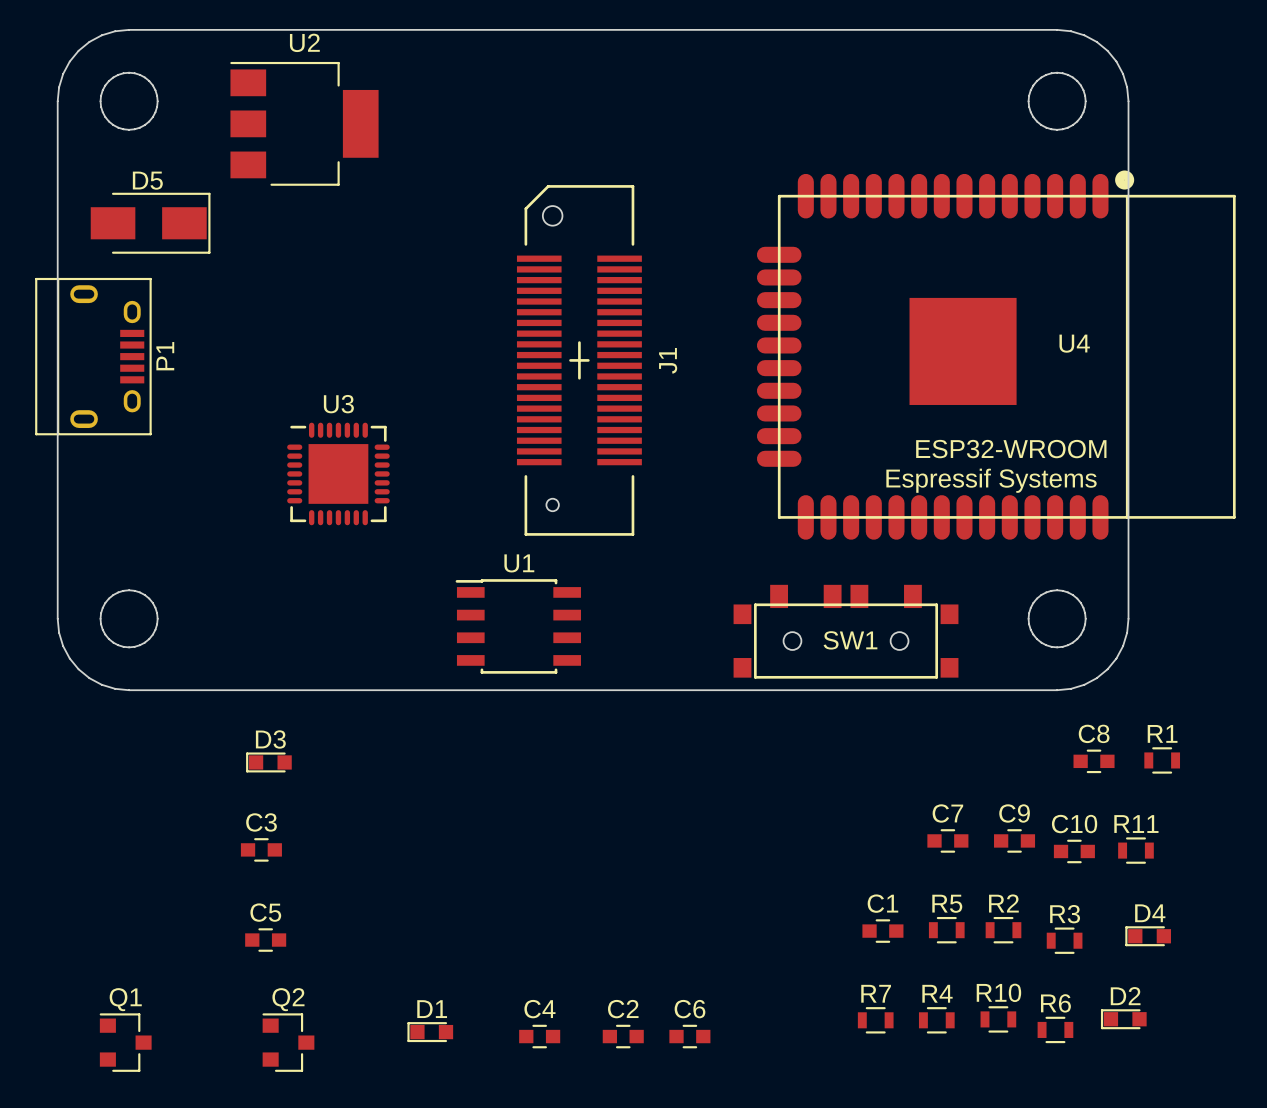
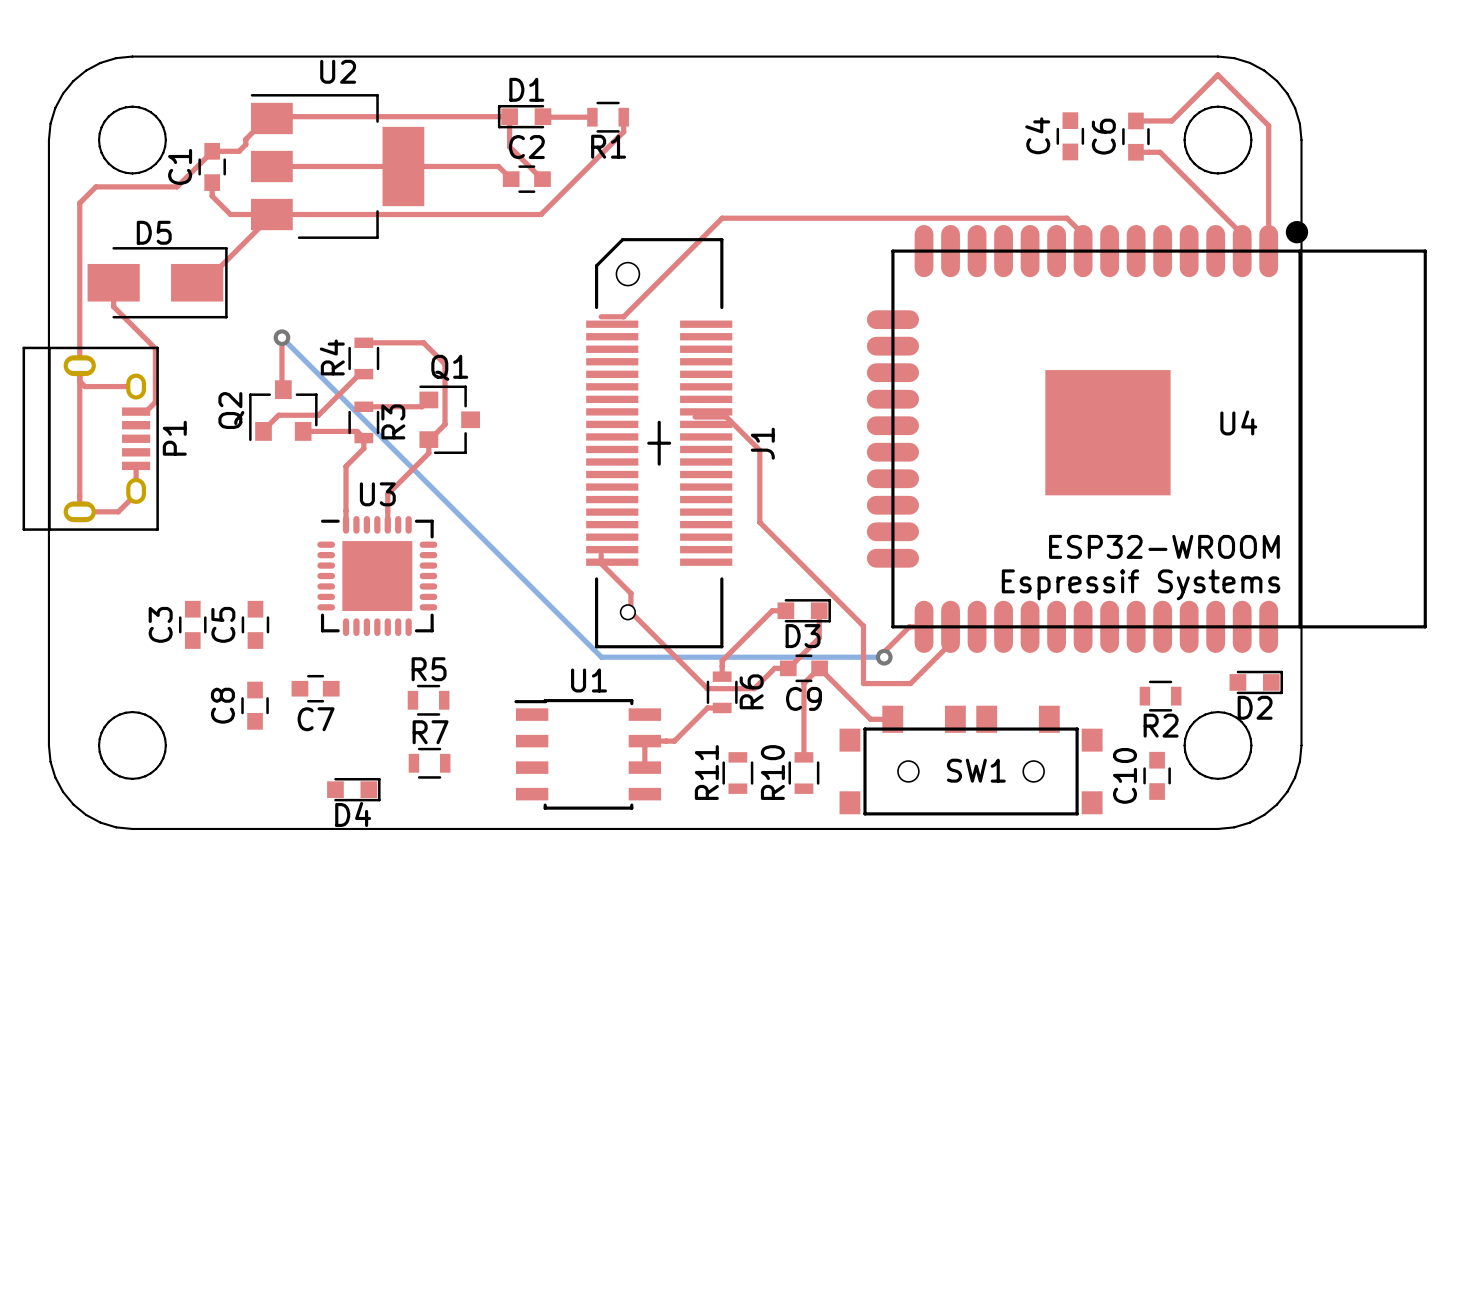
top track: none -> (543, 116) (592, 117)
top track: none -> (623, 117) (623, 131) (541, 214) (230, 214) (212, 196) (212, 182)
top track: none -> (1135, 120) (1171, 120) (1217, 74) (1268, 125) (1268, 251)
top track: none -> (1135, 152) (1160, 152) (1242, 234) (1242, 251)
top track: none -> (271, 166) (498, 166) (511, 179)
top track: none -> (542, 179) (509, 146) (509, 116) (273, 116) (266, 118) (245, 139) (245, 144) (239, 151) (212, 151) (177, 186) (95, 186) (79, 203) (79, 511) (118, 511) (136, 494) (136, 465)
top track: none -> (271, 214) (204, 282) (197, 282)
top track: none -> (1083, 251) (1083, 234) (1066, 218) (722, 218) (623, 316) (601, 316)
top track: none -> (113, 282) (113, 306) (155, 348) (155, 402) (146, 411) (136, 411)
top track: none -> (281, 337) (283, 389)
bottom track: none -> (281, 337) (601, 657) (884, 657)
via: none -> (281, 337)
top track: none -> (363, 342) (423, 342) (445, 364) (445, 424) (428, 439) (428, 453) (387, 494) (387, 524)
top track: none -> (363, 374) (359, 374) (318, 415) (278, 415) (263, 431)
top track: none -> (79, 381) (84, 386) (136, 386)
top track: none -> (428, 399) (422, 406) (363, 406)
top track: none -> (695, 417) (726, 417) (759, 450) (759, 522) (863, 626) (863, 683) (910, 683) (950, 643)
top track: none -> (303, 431) (357, 431) (363, 438) (363, 448) (346, 466) (346, 524)
top track: none -> (601, 554) (601, 563) (630, 593) (630, 612) (707, 688) (754, 688) (774, 668) (788, 668) (819, 637) (819, 610)
top track: none -> (785, 610) (772, 610) (722, 660) (722, 676)
top track: none -> (924, 626) (909, 626) (884, 652) (884, 657)
via: none -> (884, 657)
top track: none -> (722, 707) (707, 707) (674, 741) (644, 741) (644, 767)
top track: none -> (892, 719) (870, 719) (819, 668) (803, 683) (803, 757)
C8 name position: C8 (1094, 733) -> C8 (222, 705)
R1 name position: R1 (1162, 733) -> R1 (608, 146)
R1 position: (1162, 760) -> (608, 117)
C8 rotation: 0° (1094, 761) -> 90° clockwise (255, 705)
C8 position: (1094, 761) -> (255, 705)
D3 rotation: 0° (268, 762) -> 180° (804, 610)
D3 position: (268, 762) -> (804, 610)
C7 name position: C7 (947, 813) -> C7 (316, 719)
C9 name position: C9 (1014, 813) -> C9 (803, 698)
C3 name position: C3 (261, 822) -> C3 (160, 624)
C10 name position: C10 (1074, 824) -> C10 (1124, 775)
R11 name position: R11 (1136, 824) -> R11 (706, 772)
C7 position: (947, 840) -> (315, 688)
C9 position: (1014, 840) -> (803, 668)
C3 rotation: 0° (261, 849) -> 90° clockwise (192, 624)
C3 position: (261, 849) -> (192, 624)
R11 rotation: 0° (1135, 850) -> 90° clockwise (737, 773)
R11 position: (1135, 850) -> (737, 773)
C10 rotation: 0° (1074, 851) -> 90° clockwise (1157, 775)
C10 position: (1074, 851) -> (1157, 775)
C1 name position: C1 (882, 903) -> C1 (180, 166)
R2 name position: R2 (1003, 903) -> R2 (1161, 725)
C5 name position: C5 (265, 912) -> C5 (223, 624)
R5 position: (946, 930) -> (428, 700)
R2 position: (1003, 930) -> (1160, 696)
C1 rotation: 0° (882, 931) -> 90° clockwise (212, 166)
C1 position: (882, 931) -> (212, 166)
D4 rotation: 0° (1148, 936) -> 180° (353, 789)
D4 position: (1148, 936) -> (353, 789)
C5 rotation: 0° (265, 940) -> 90° clockwise (255, 624)
C5 position: (265, 940) -> (255, 624)
R3 rotation: 0° (1064, 940) -> 90° clockwise (363, 422)
R3 position: (1064, 940) -> (363, 422)
R10 name position: R10 (998, 992) -> R10 (772, 772)
R4 name position: R4 (937, 993) -> R4 (332, 357)
C4 name position: C4 (539, 1009) -> C4 (1037, 135)
C6 name position: C6 (689, 1009) -> C6 (1103, 136)
R10 rotation: 0° (998, 1019) -> 90° clockwise (803, 773)
R10 position: (998, 1019) -> (803, 773)
D2 rotation: 0° (1123, 1019) -> 180° (1256, 682)
D2 position: (1123, 1019) -> (1256, 682)
R7 position: (875, 1020) -> (429, 763)
R4 rotation: 0° (936, 1020) -> 90° clockwise (363, 358)
R4 position: (936, 1020) -> (363, 358)
R6 rotation: 0° (1055, 1029) -> 90° clockwise (722, 692)
R6 position: (1055, 1029) -> (722, 692)
D1 position: (430, 1032) -> (524, 116)
C4 rotation: 0° (539, 1036) -> 90° clockwise (1070, 136)
C4 position: (539, 1036) -> (1070, 136)
C2 position: (623, 1036) -> (526, 179)
C6 rotation: 0° (689, 1036) -> 90° clockwise (1135, 136)
C6 position: (689, 1036) -> (1135, 136)
Q1 position: (125, 1042) -> (449, 419)
Q2 rotation: 0° (288, 1042) -> 90° counterclockwise (283, 410)
Q2 position: (288, 1042) -> (283, 410)

